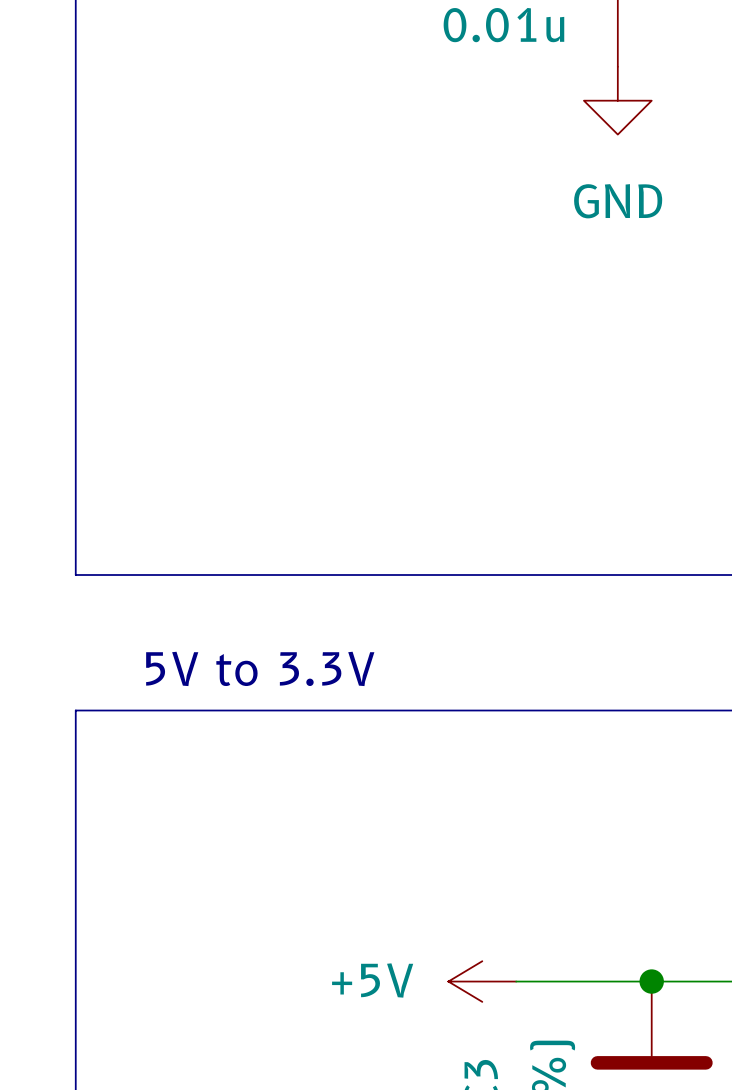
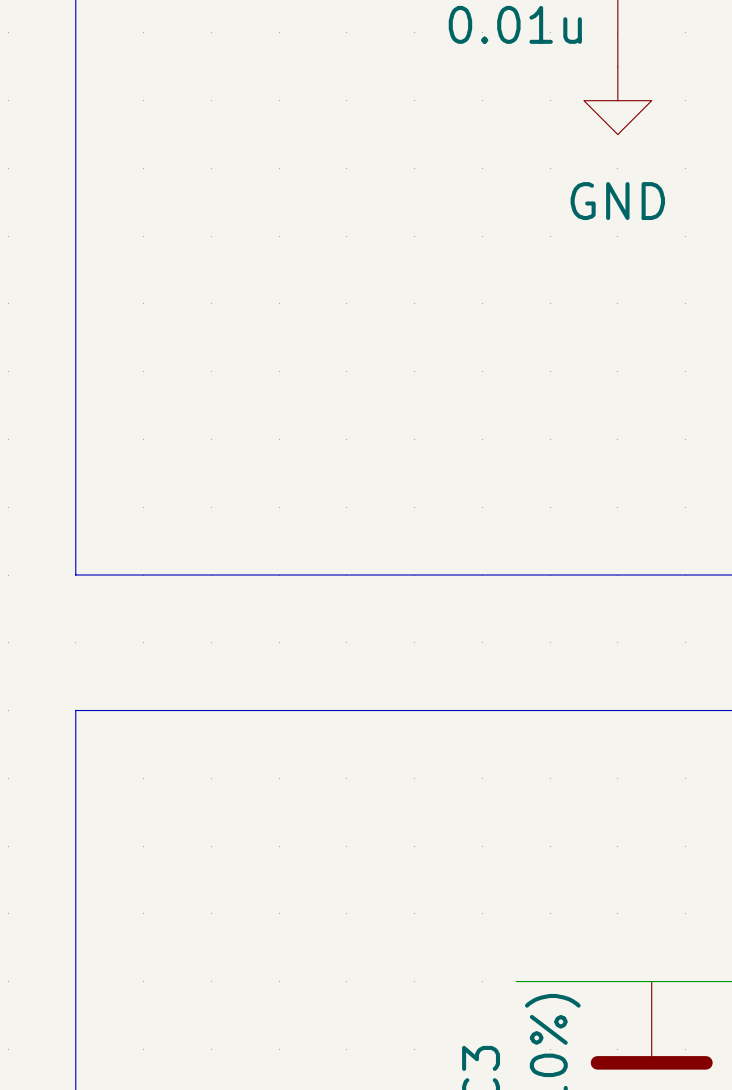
text: 5V to 3.3V (260, 668) -> none
power symbol: +5V (482, 981) -> none
junction: (651, 981) -> none

